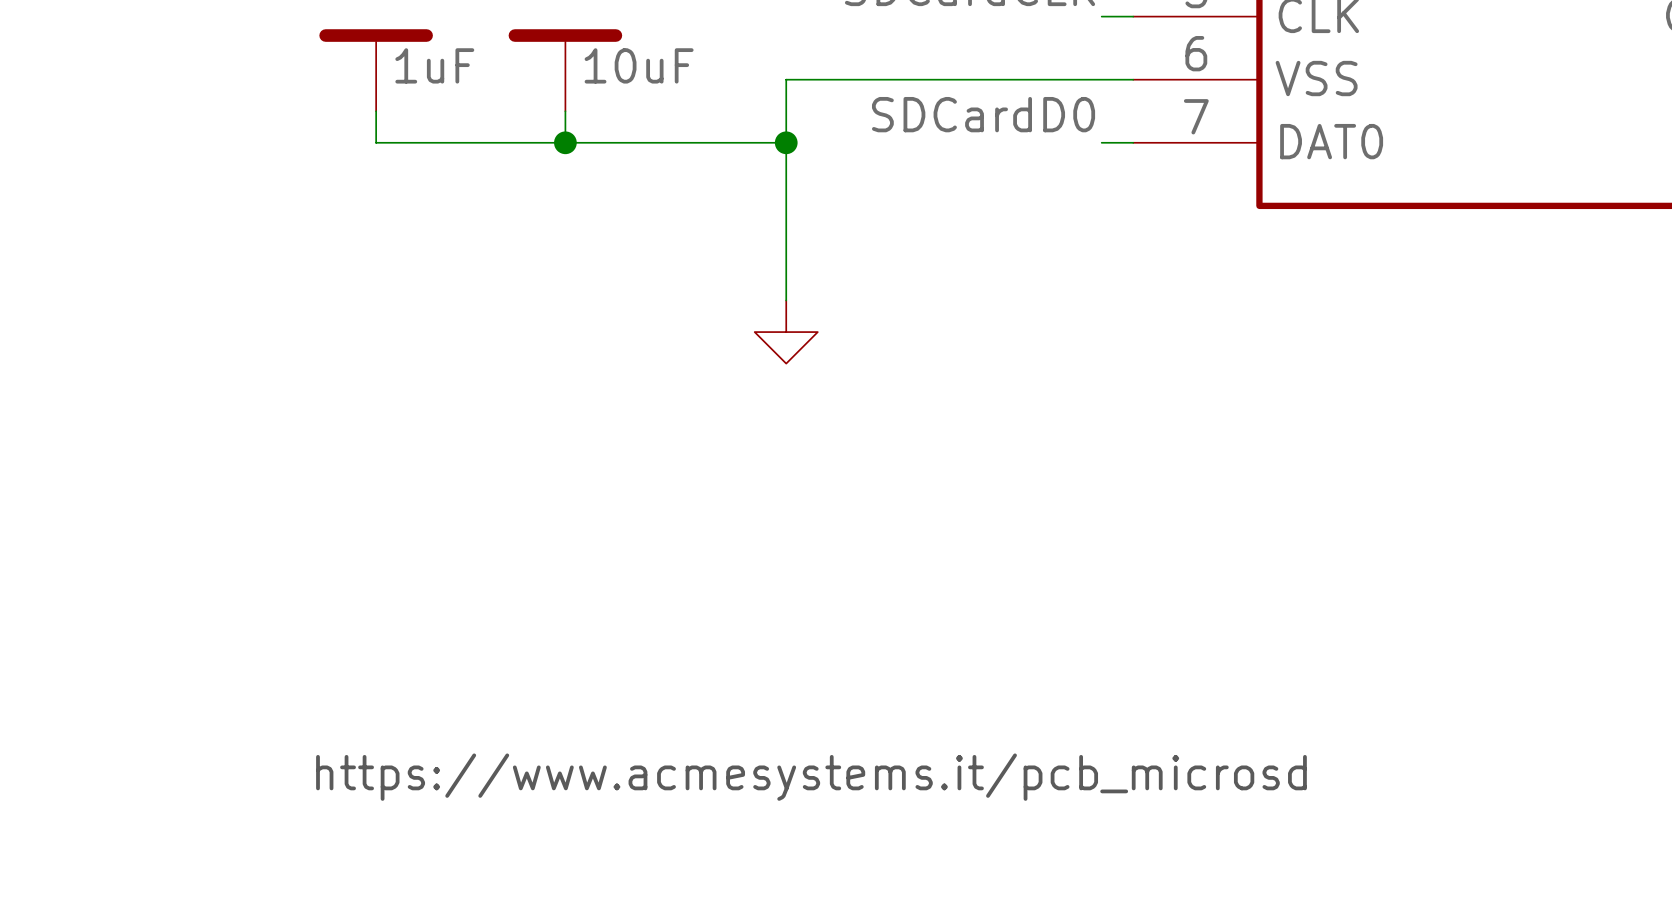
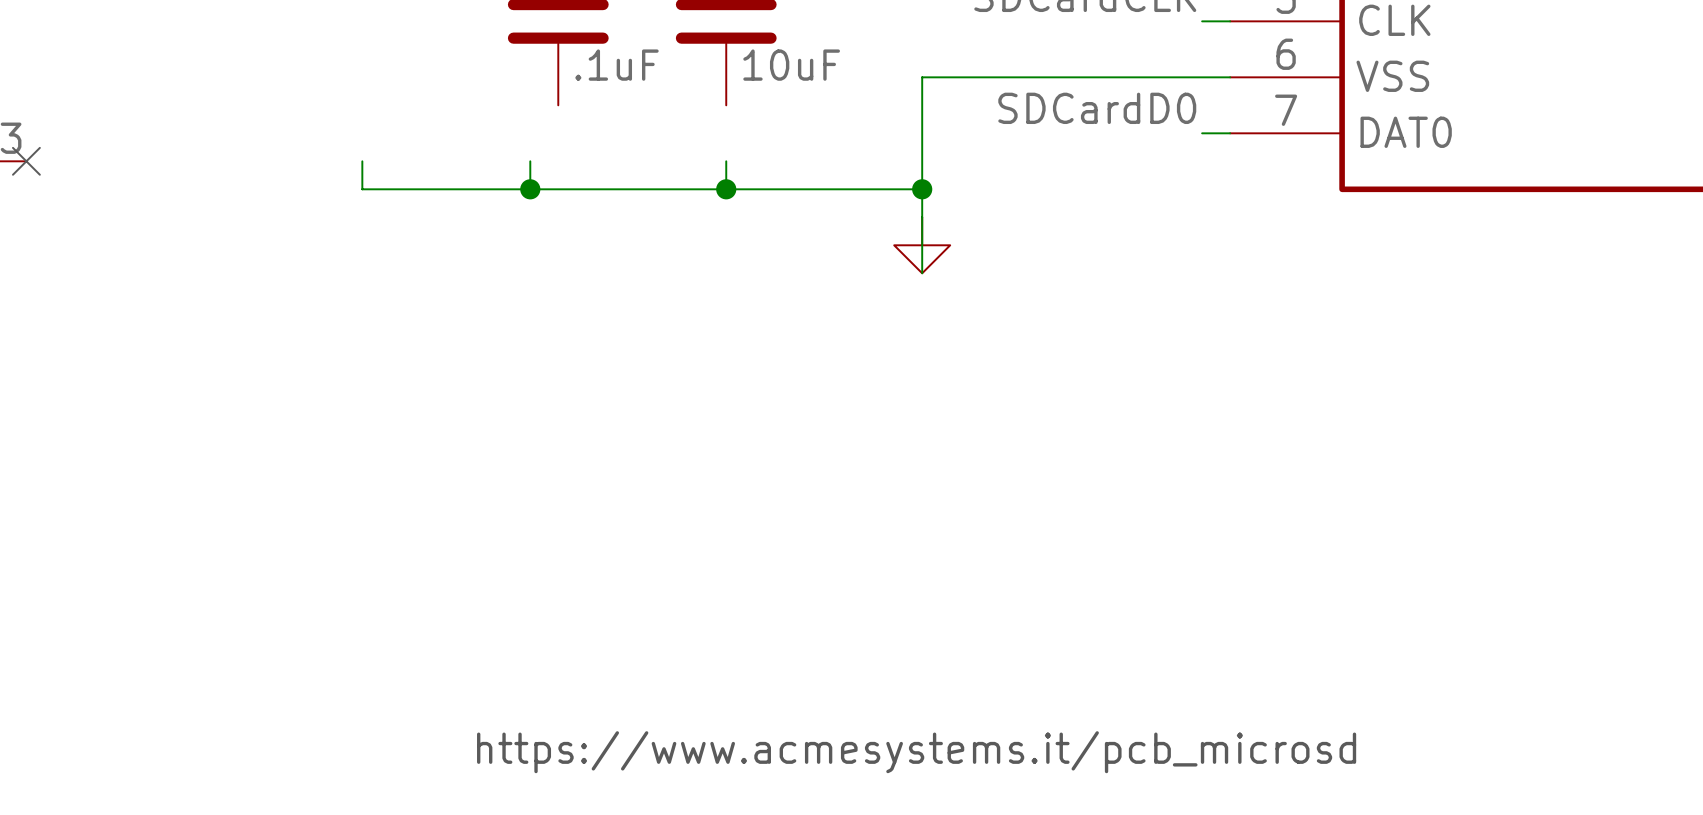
part value: 1uF (434, 65) -> .1uF (617, 65)
wire: (376, 111) (376, 142) (786, 142) -> none
wire: (565, 111) (565, 142) -> (726, 161) (726, 189)
junction position: (565, 142) -> (726, 189)
junction position: (786, 142) -> (922, 189)
wire: none -> (362, 161) (362, 189) (922, 189)
wire: none -> (530, 161) (530, 189)
junction: none -> (530, 189)
power symbol position: (786, 332) -> (922, 245)
text position: https://www.acmesystems.it/pcb_microsd (811, 777) -> https://www.acmesystems.it/pcb_microsd (916, 752)

